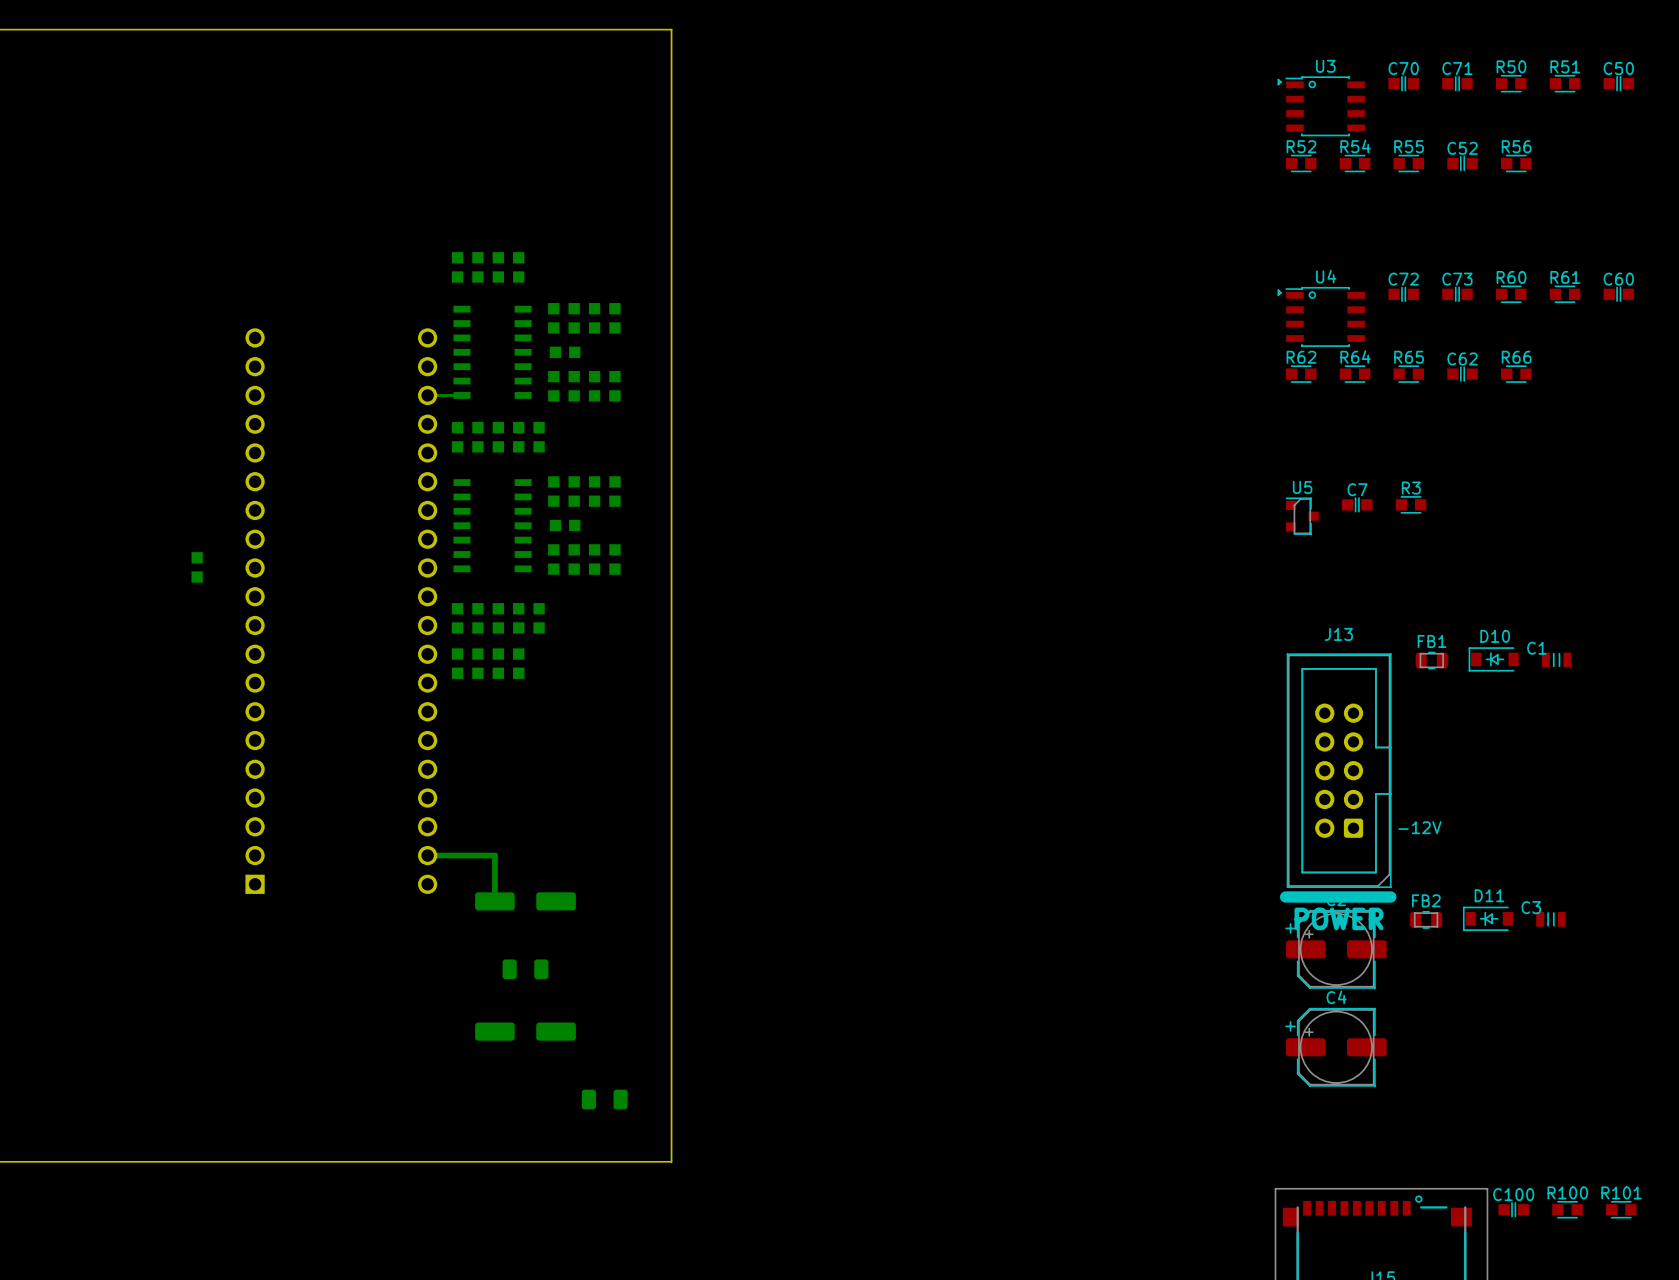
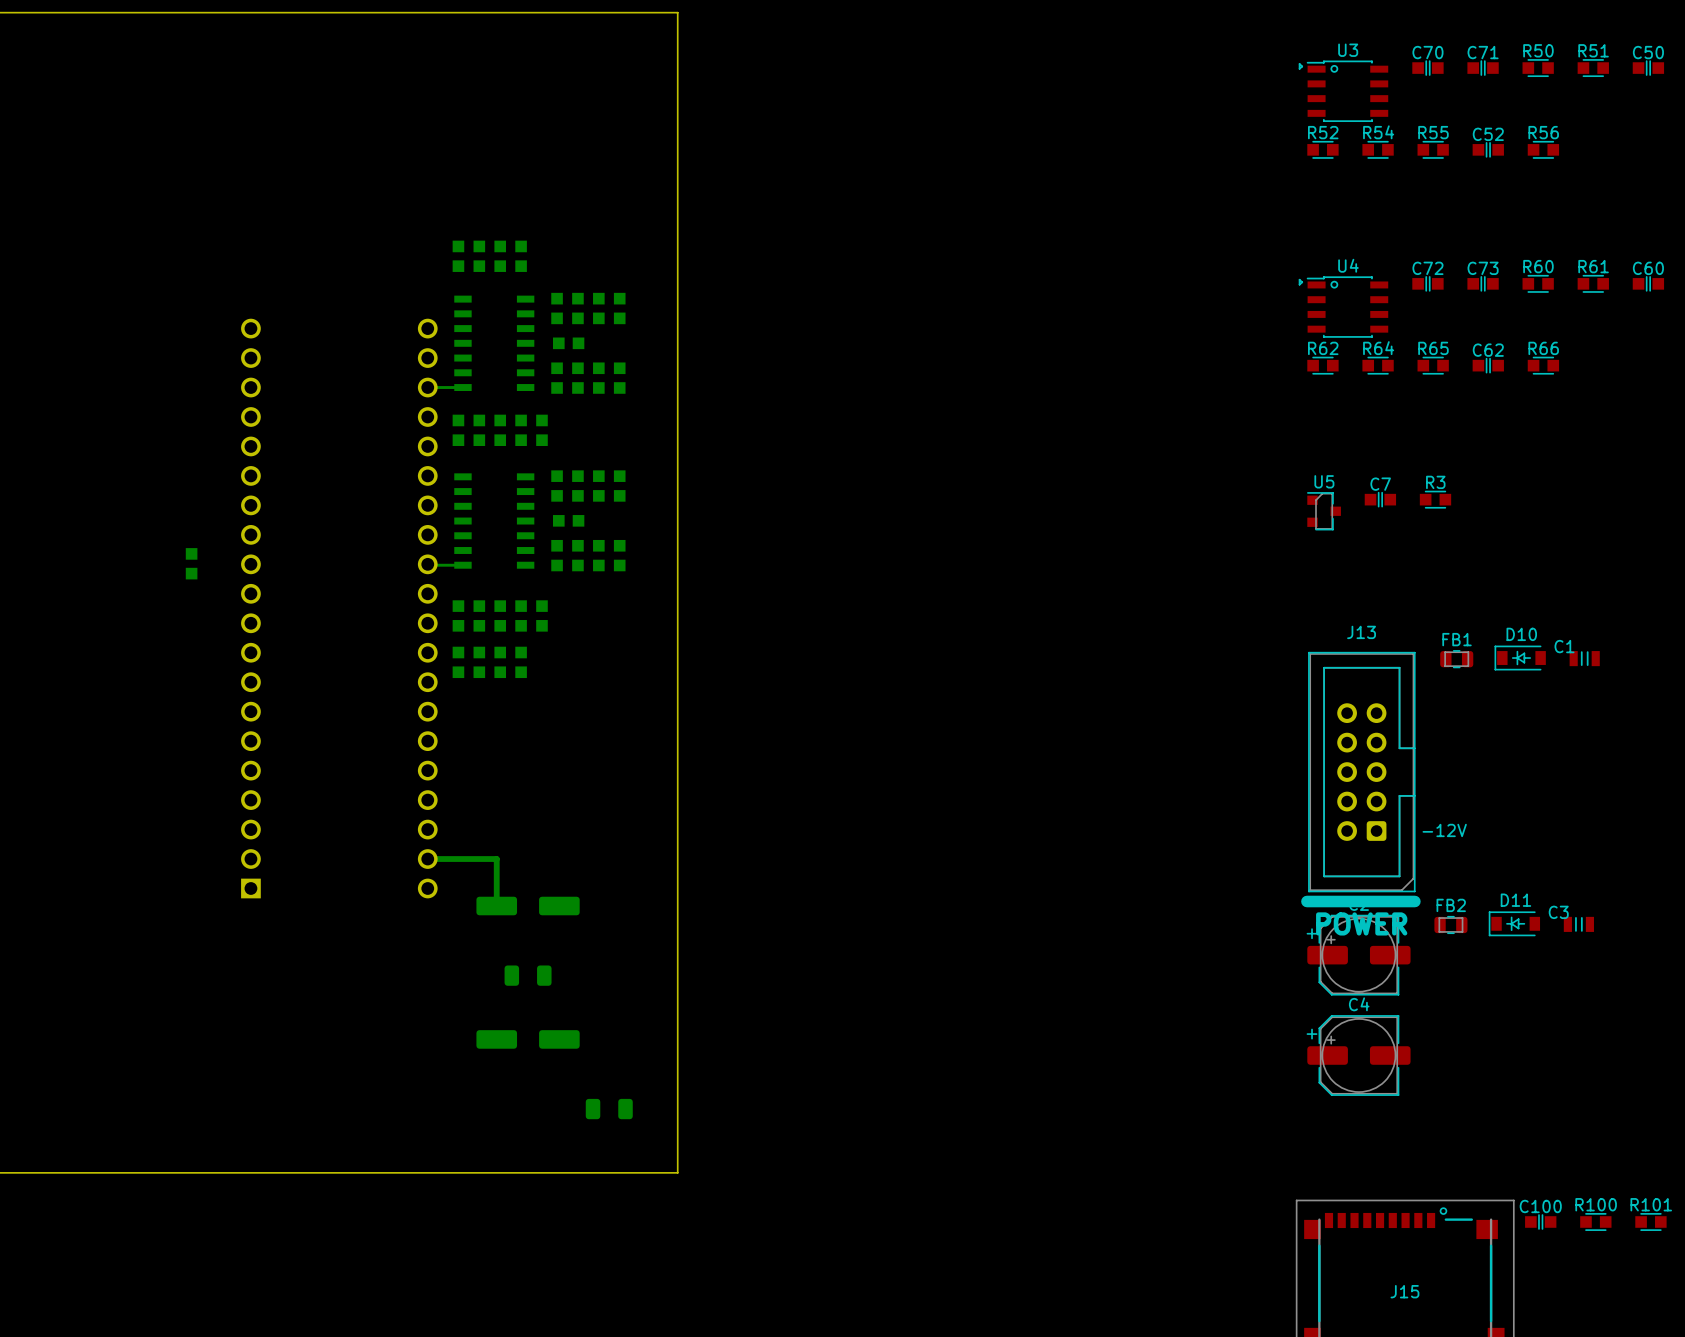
bottom track: none -> (427, 564) (462, 565)

